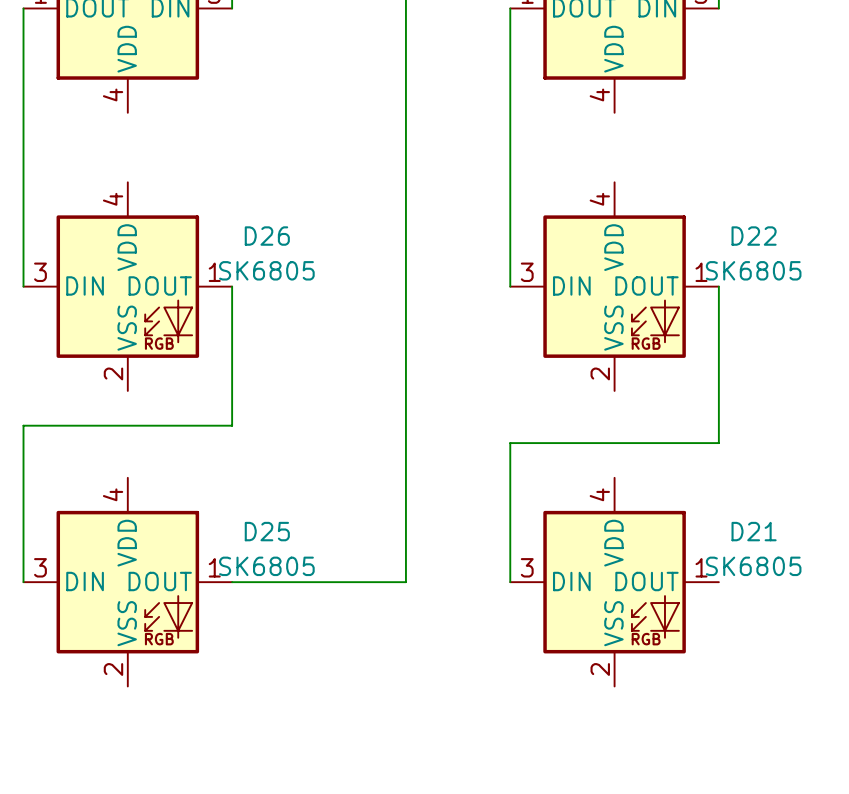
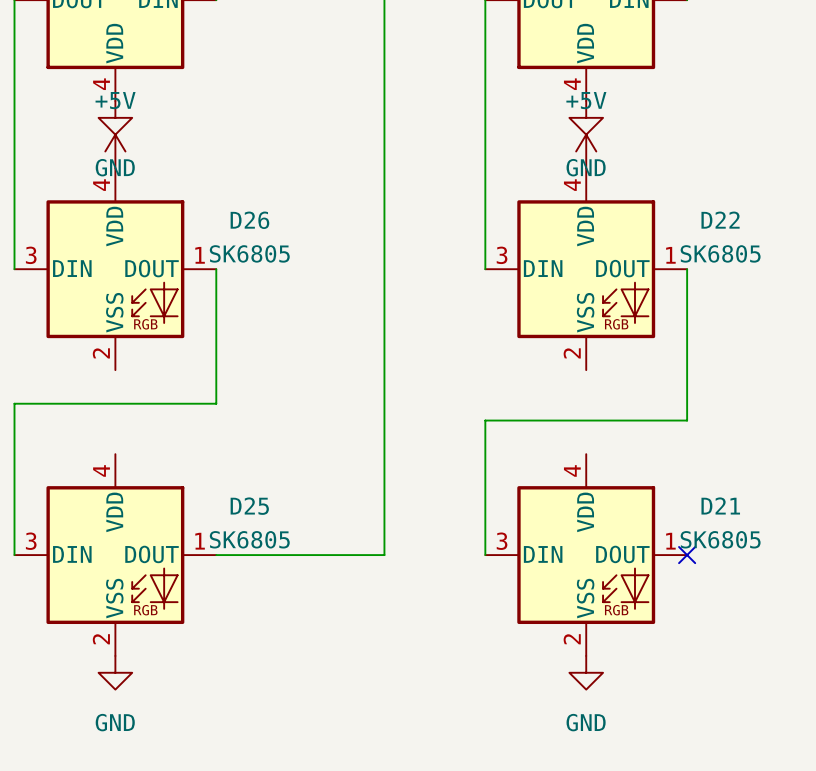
power symbol: none -> GND (115, 117)
power symbol: none -> GND (586, 117)
power symbol: none -> +5V (115, 151)
power symbol: none -> +5V (586, 151)
no-connect mark: none -> (687, 555)
power symbol: none -> GND (115, 672)
power symbol: none -> GND (586, 672)

